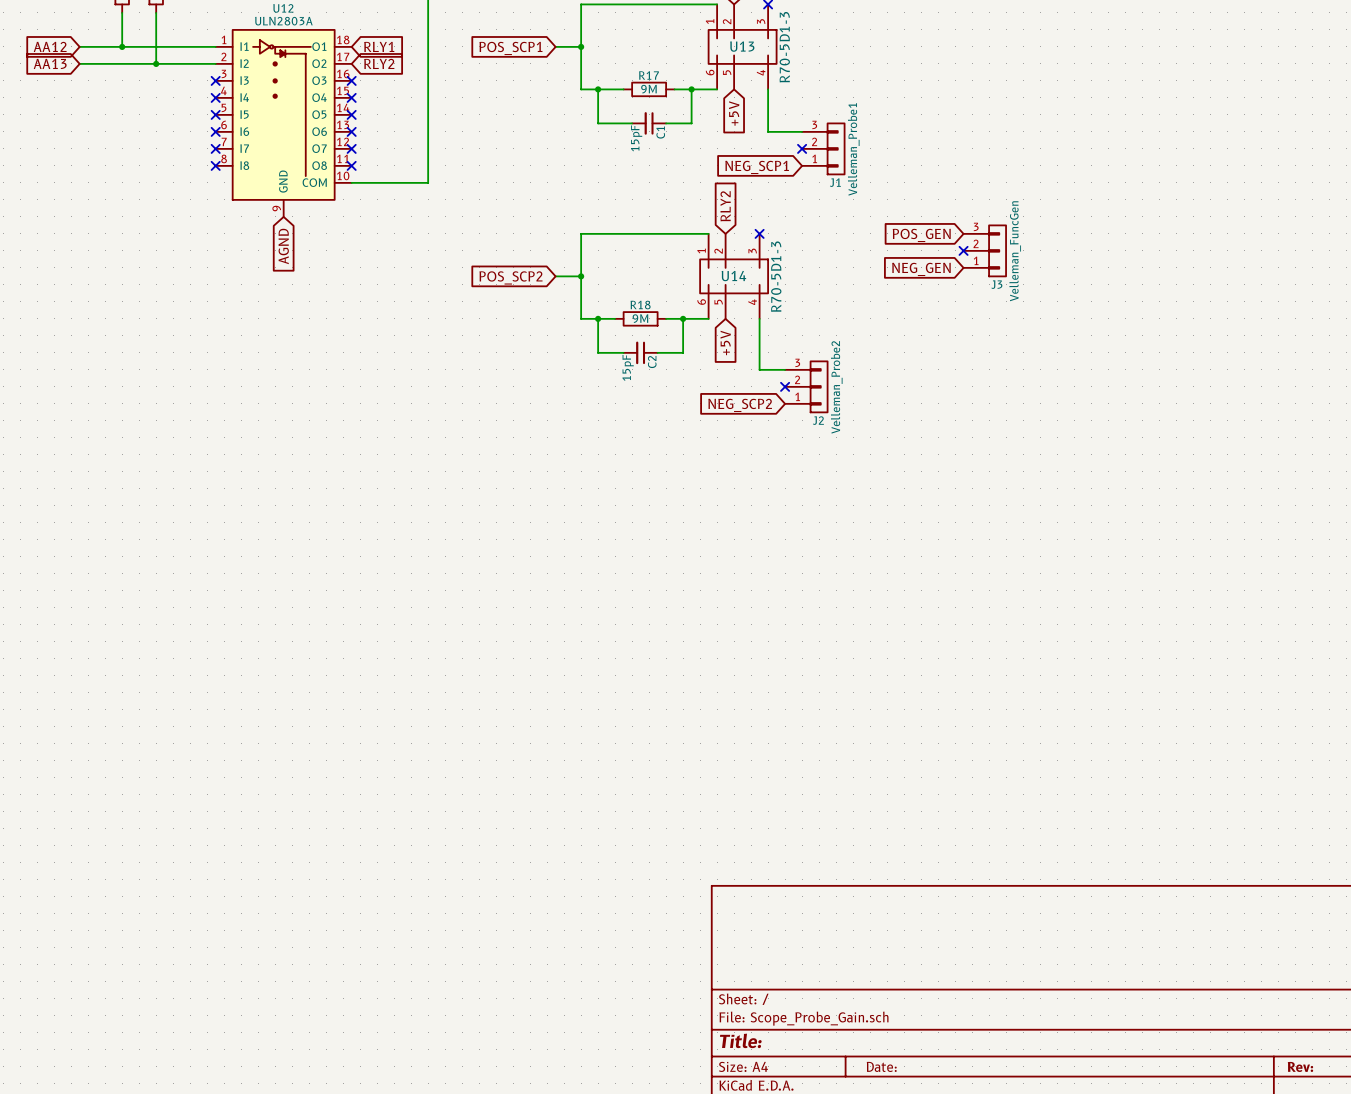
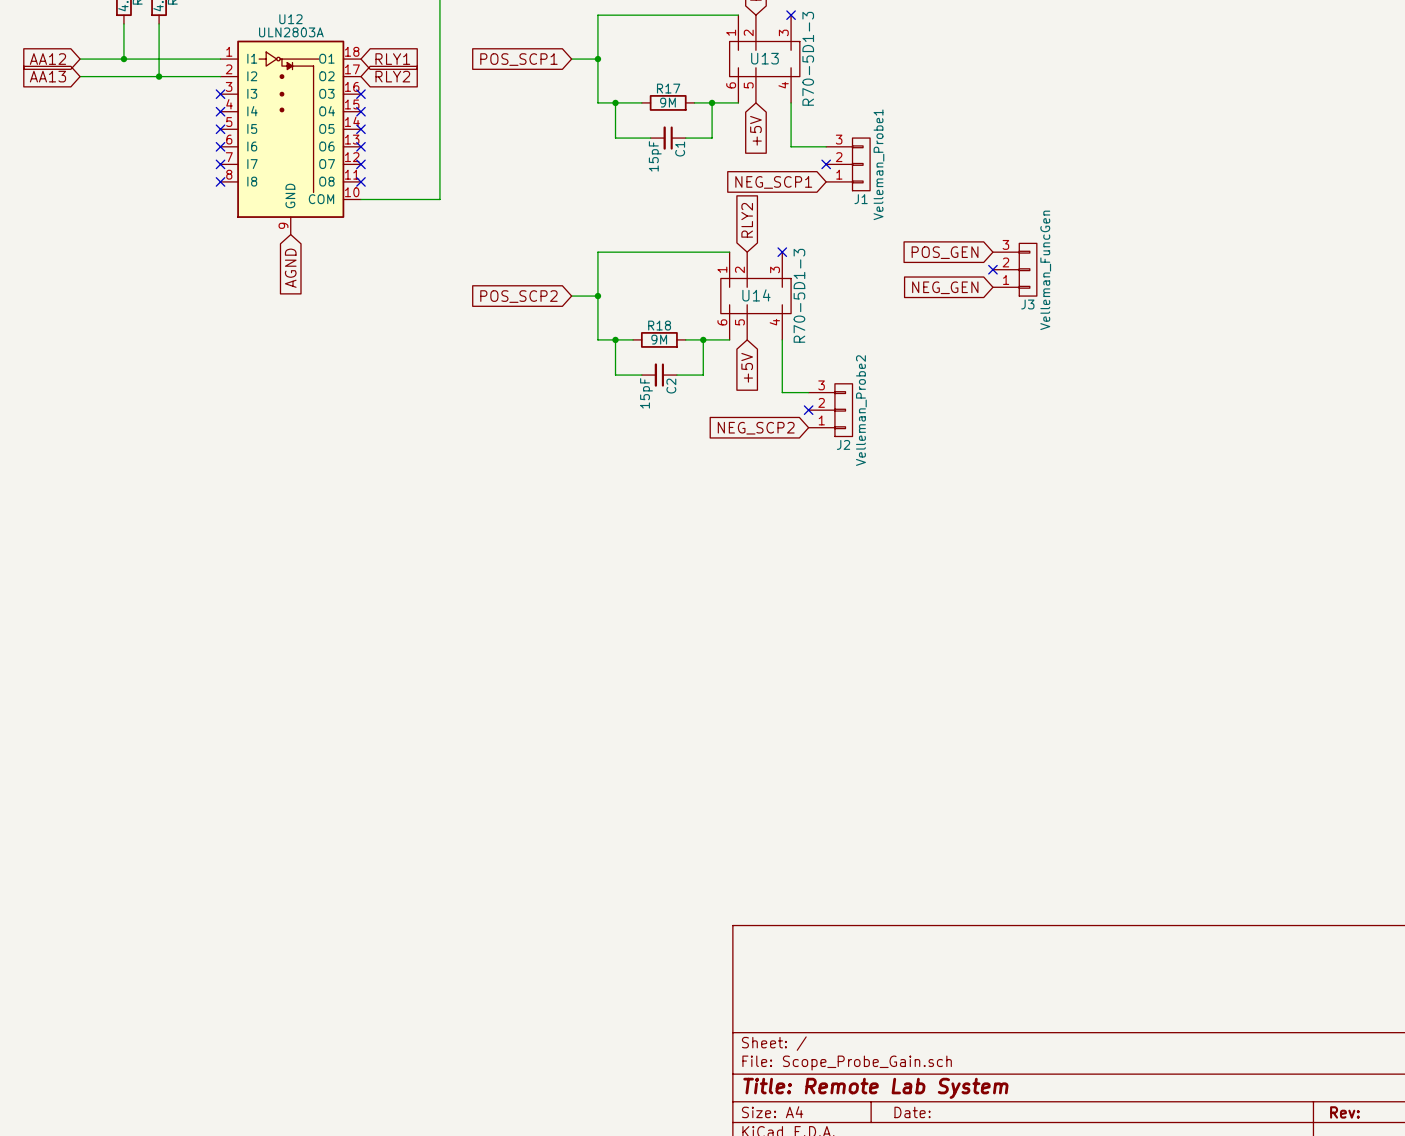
title block: Title: (740, 1040) -> Title: Remote Lab System (875, 1088)

